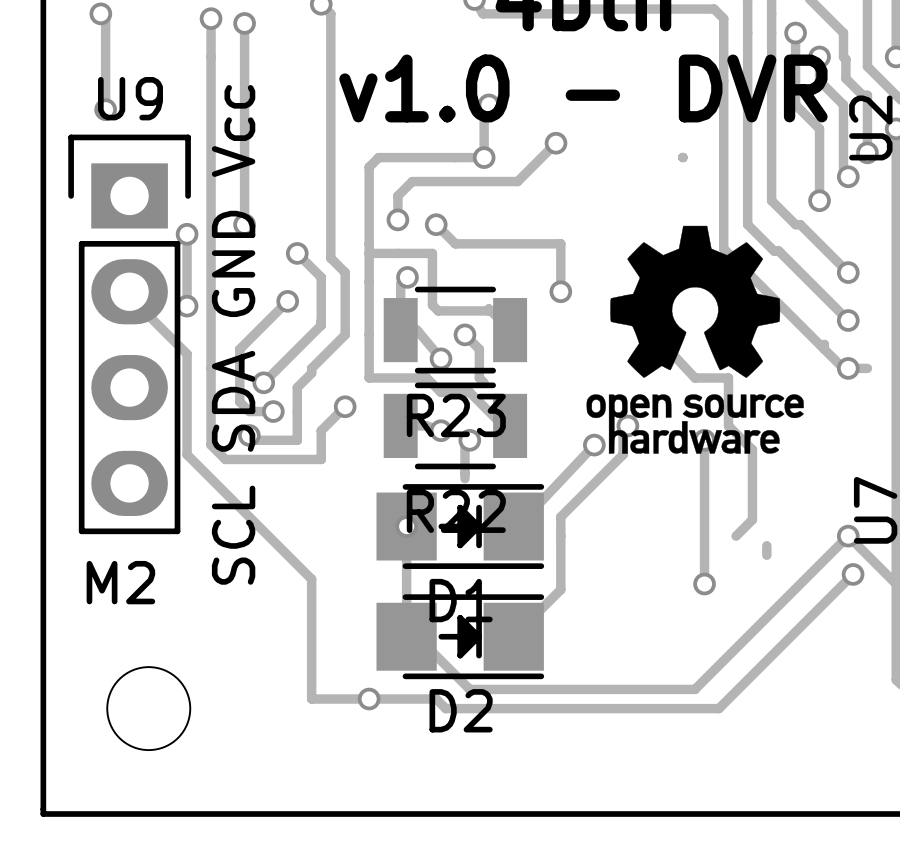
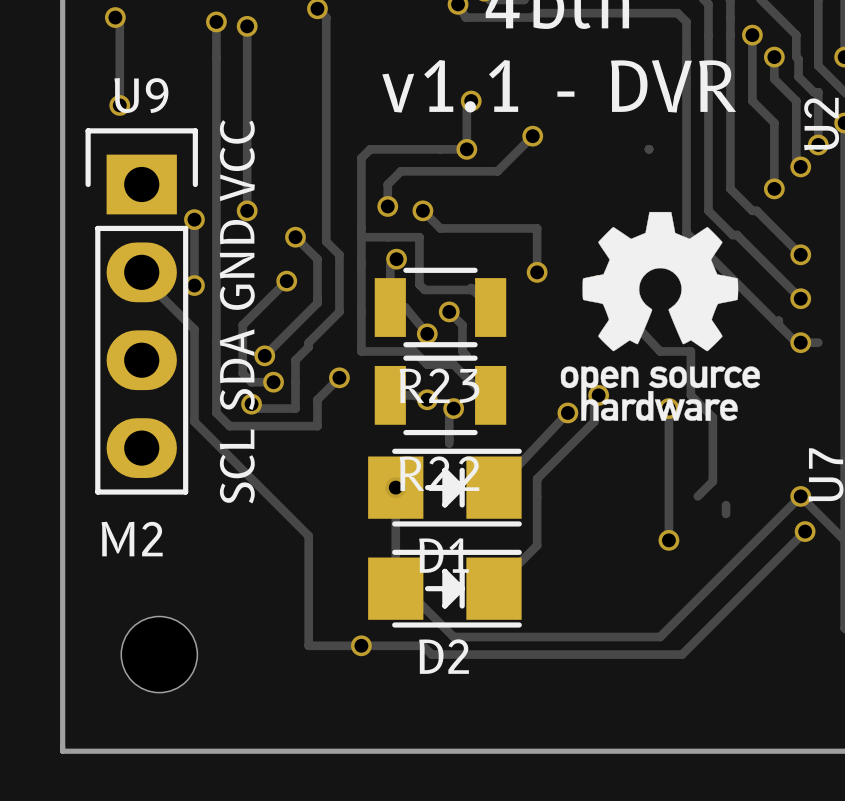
text: v1.0 - DVR (583, 88) -> v1.1 - DVR (559, 86)
U9 value: SCL SDA GND Vcc (233, 334) -> SCL SDA GND VCC (237, 311)

